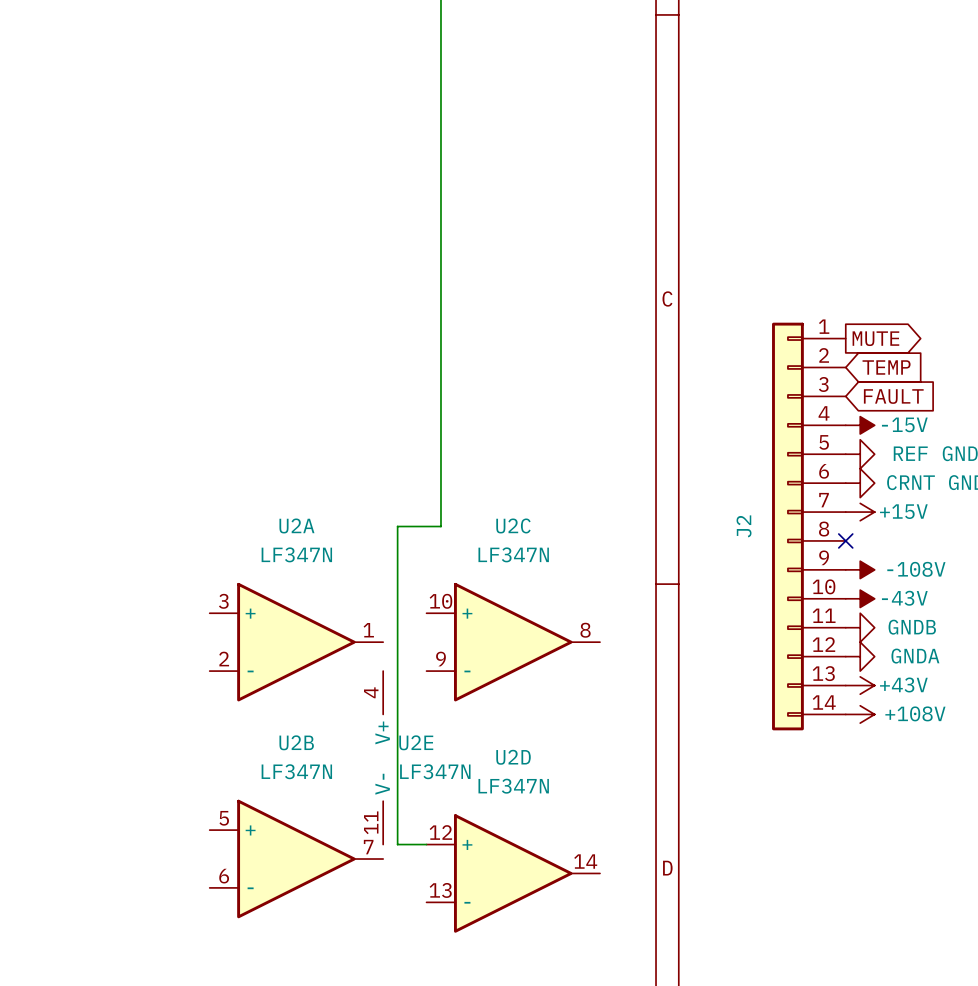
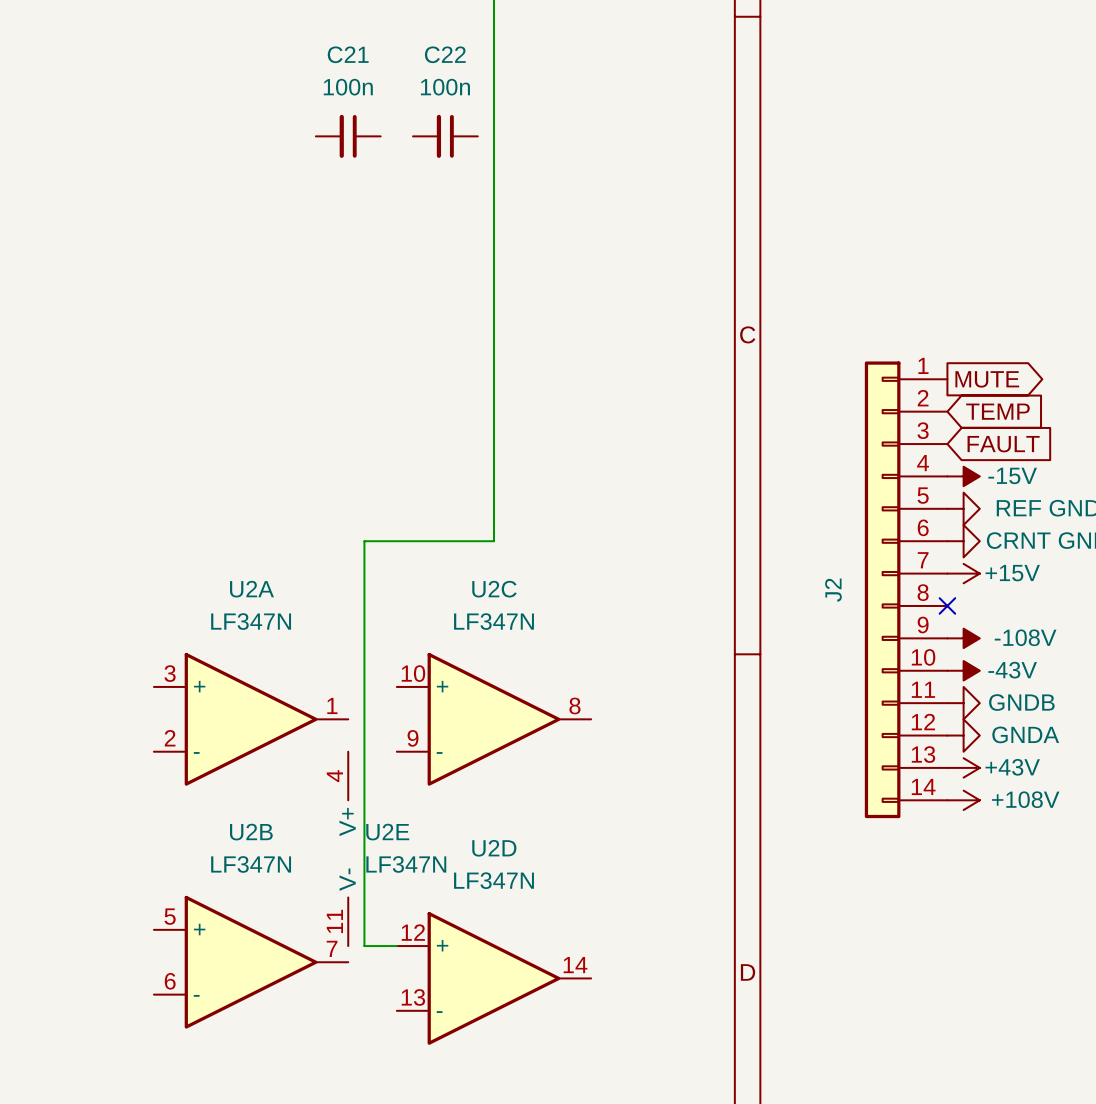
C21: none -> 100n (348, 136)
C22: none -> 100n (445, 136)
wire: (440, 483) (440, 526) (397, 526) (397, 844) (426, 844) -> (493, 541) (364, 541) (364, 946) (396, 946)
U2A position: (296, 642) -> (251, 719)
U2C position: (513, 642) -> (493, 719)
U2E position: (383, 757) -> (348, 848)
U2B position: (296, 859) -> (251, 962)
U2D position: (513, 873) -> (493, 978)

